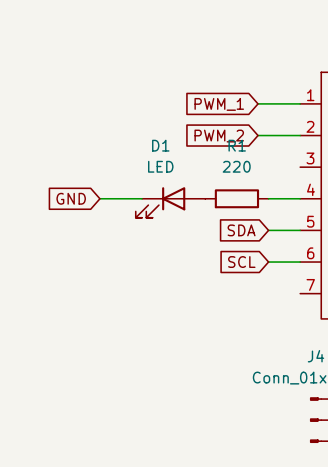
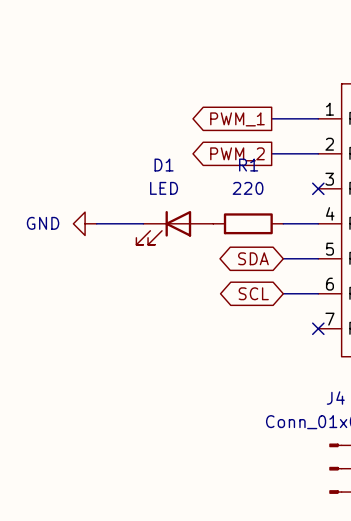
global label shape: input (219, 104) -> output (237, 119)
global label shape: input (219, 136) -> output (237, 154)
no-connect mark: none -> (318, 188)
global label: GND (71, 198) -> none
power symbol: none -> GND (85, 223)
global label shape: input (241, 230) -> bidirectional (253, 258)
global label shape: input (241, 262) -> bidirectional (253, 293)
no-connect mark: none -> (318, 328)

